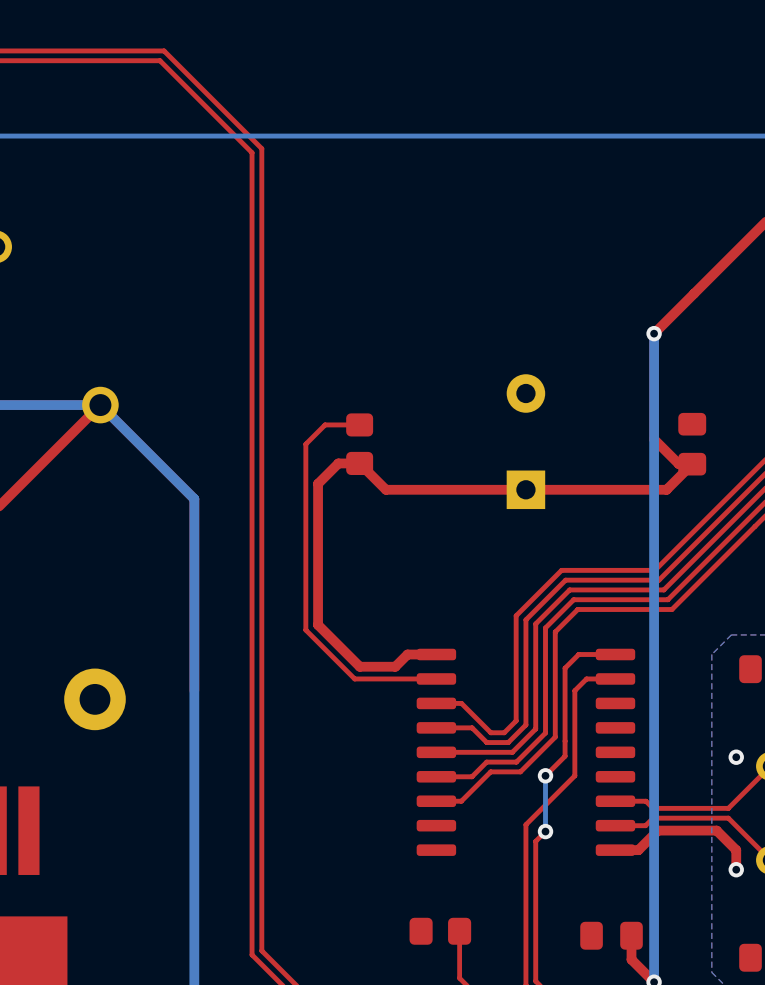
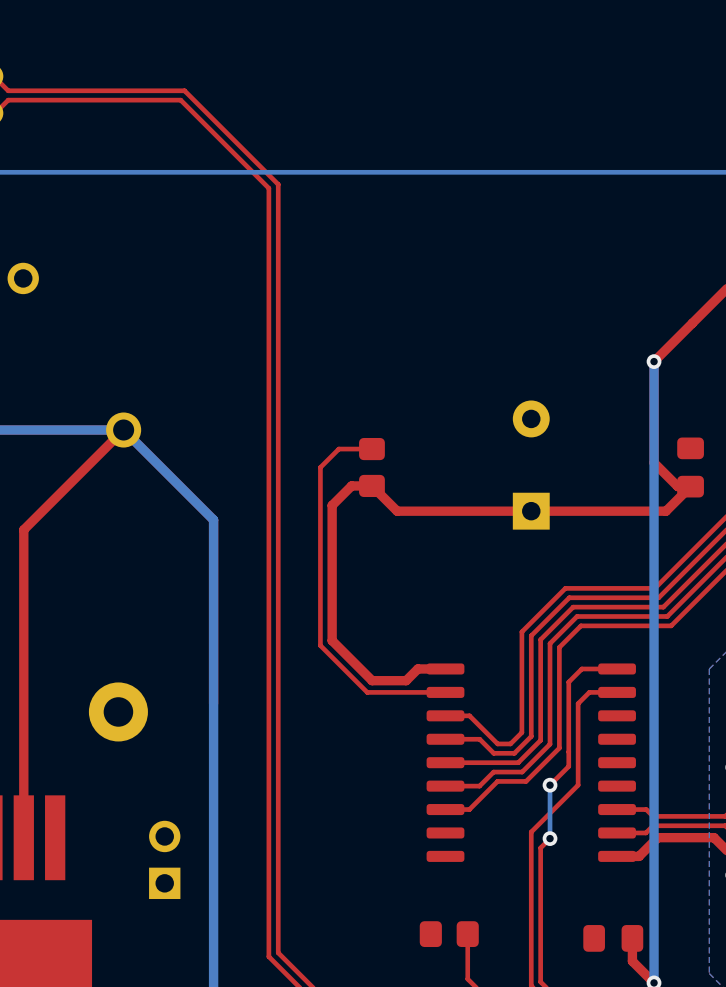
part: none -> (164, 859)

